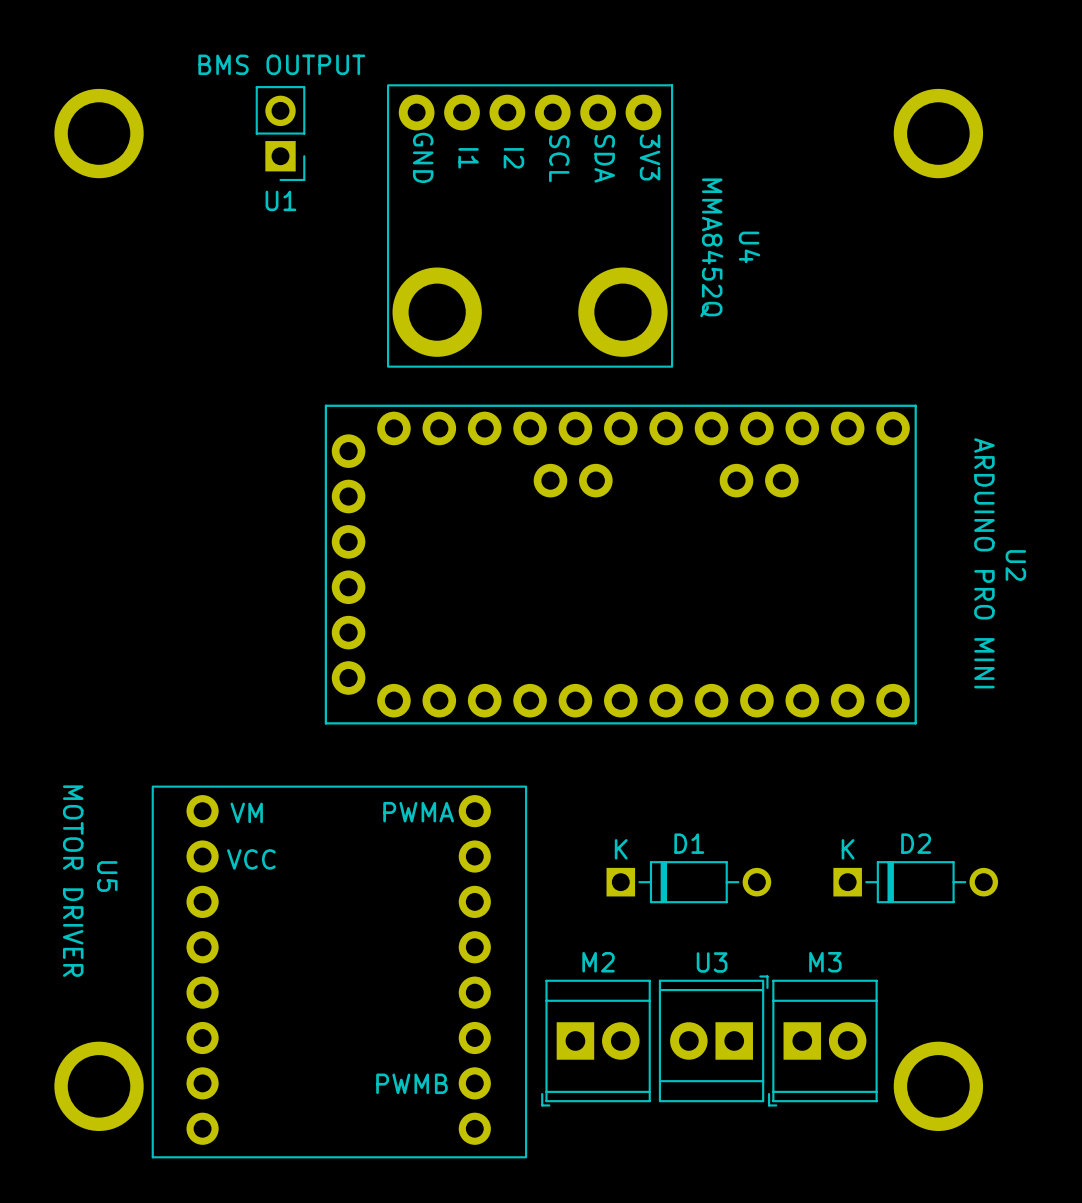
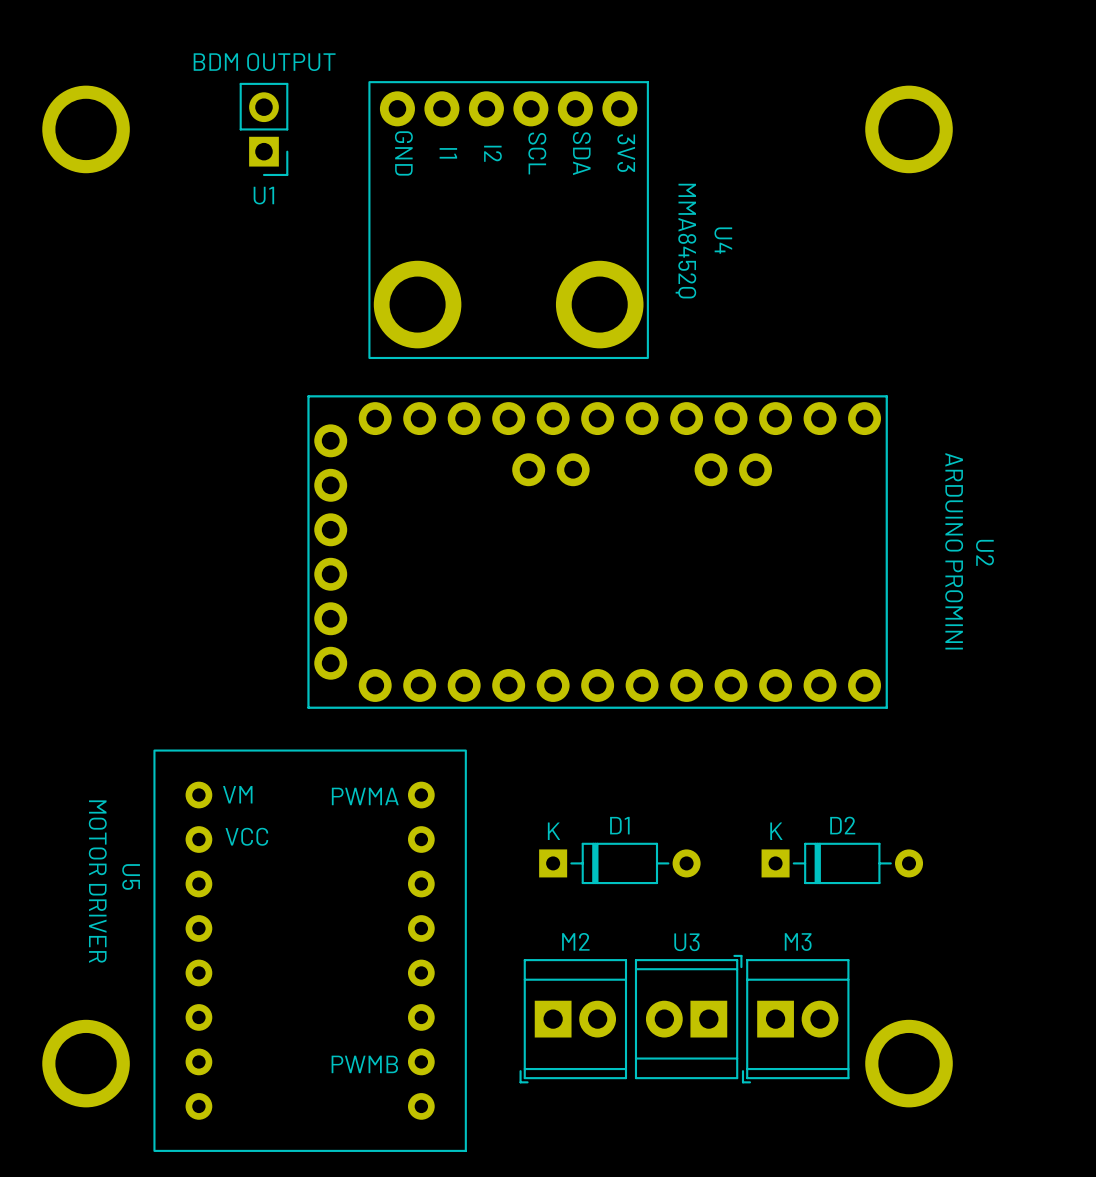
U1 value: BMS OUTPUT (281, 64) -> BDM OUTPUT (264, 62)
U2 value: ARDUINO PRO MINI (984, 563) -> ARDUINO PROMINI (954, 551)
U5 footprint: [151, 785, 528, 1159] -> [153, 749, 467, 1152]
D1 footprint: [606, 861, 772, 904] -> [539, 842, 701, 885]
D2 footprint: [833, 861, 999, 904] -> [761, 842, 924, 885]
U5 name position: U5 (107, 876) -> U5 (131, 876)
U5 value position: MOTOR DRIVER (73, 881) -> MOTOR DRIVER (97, 881)

